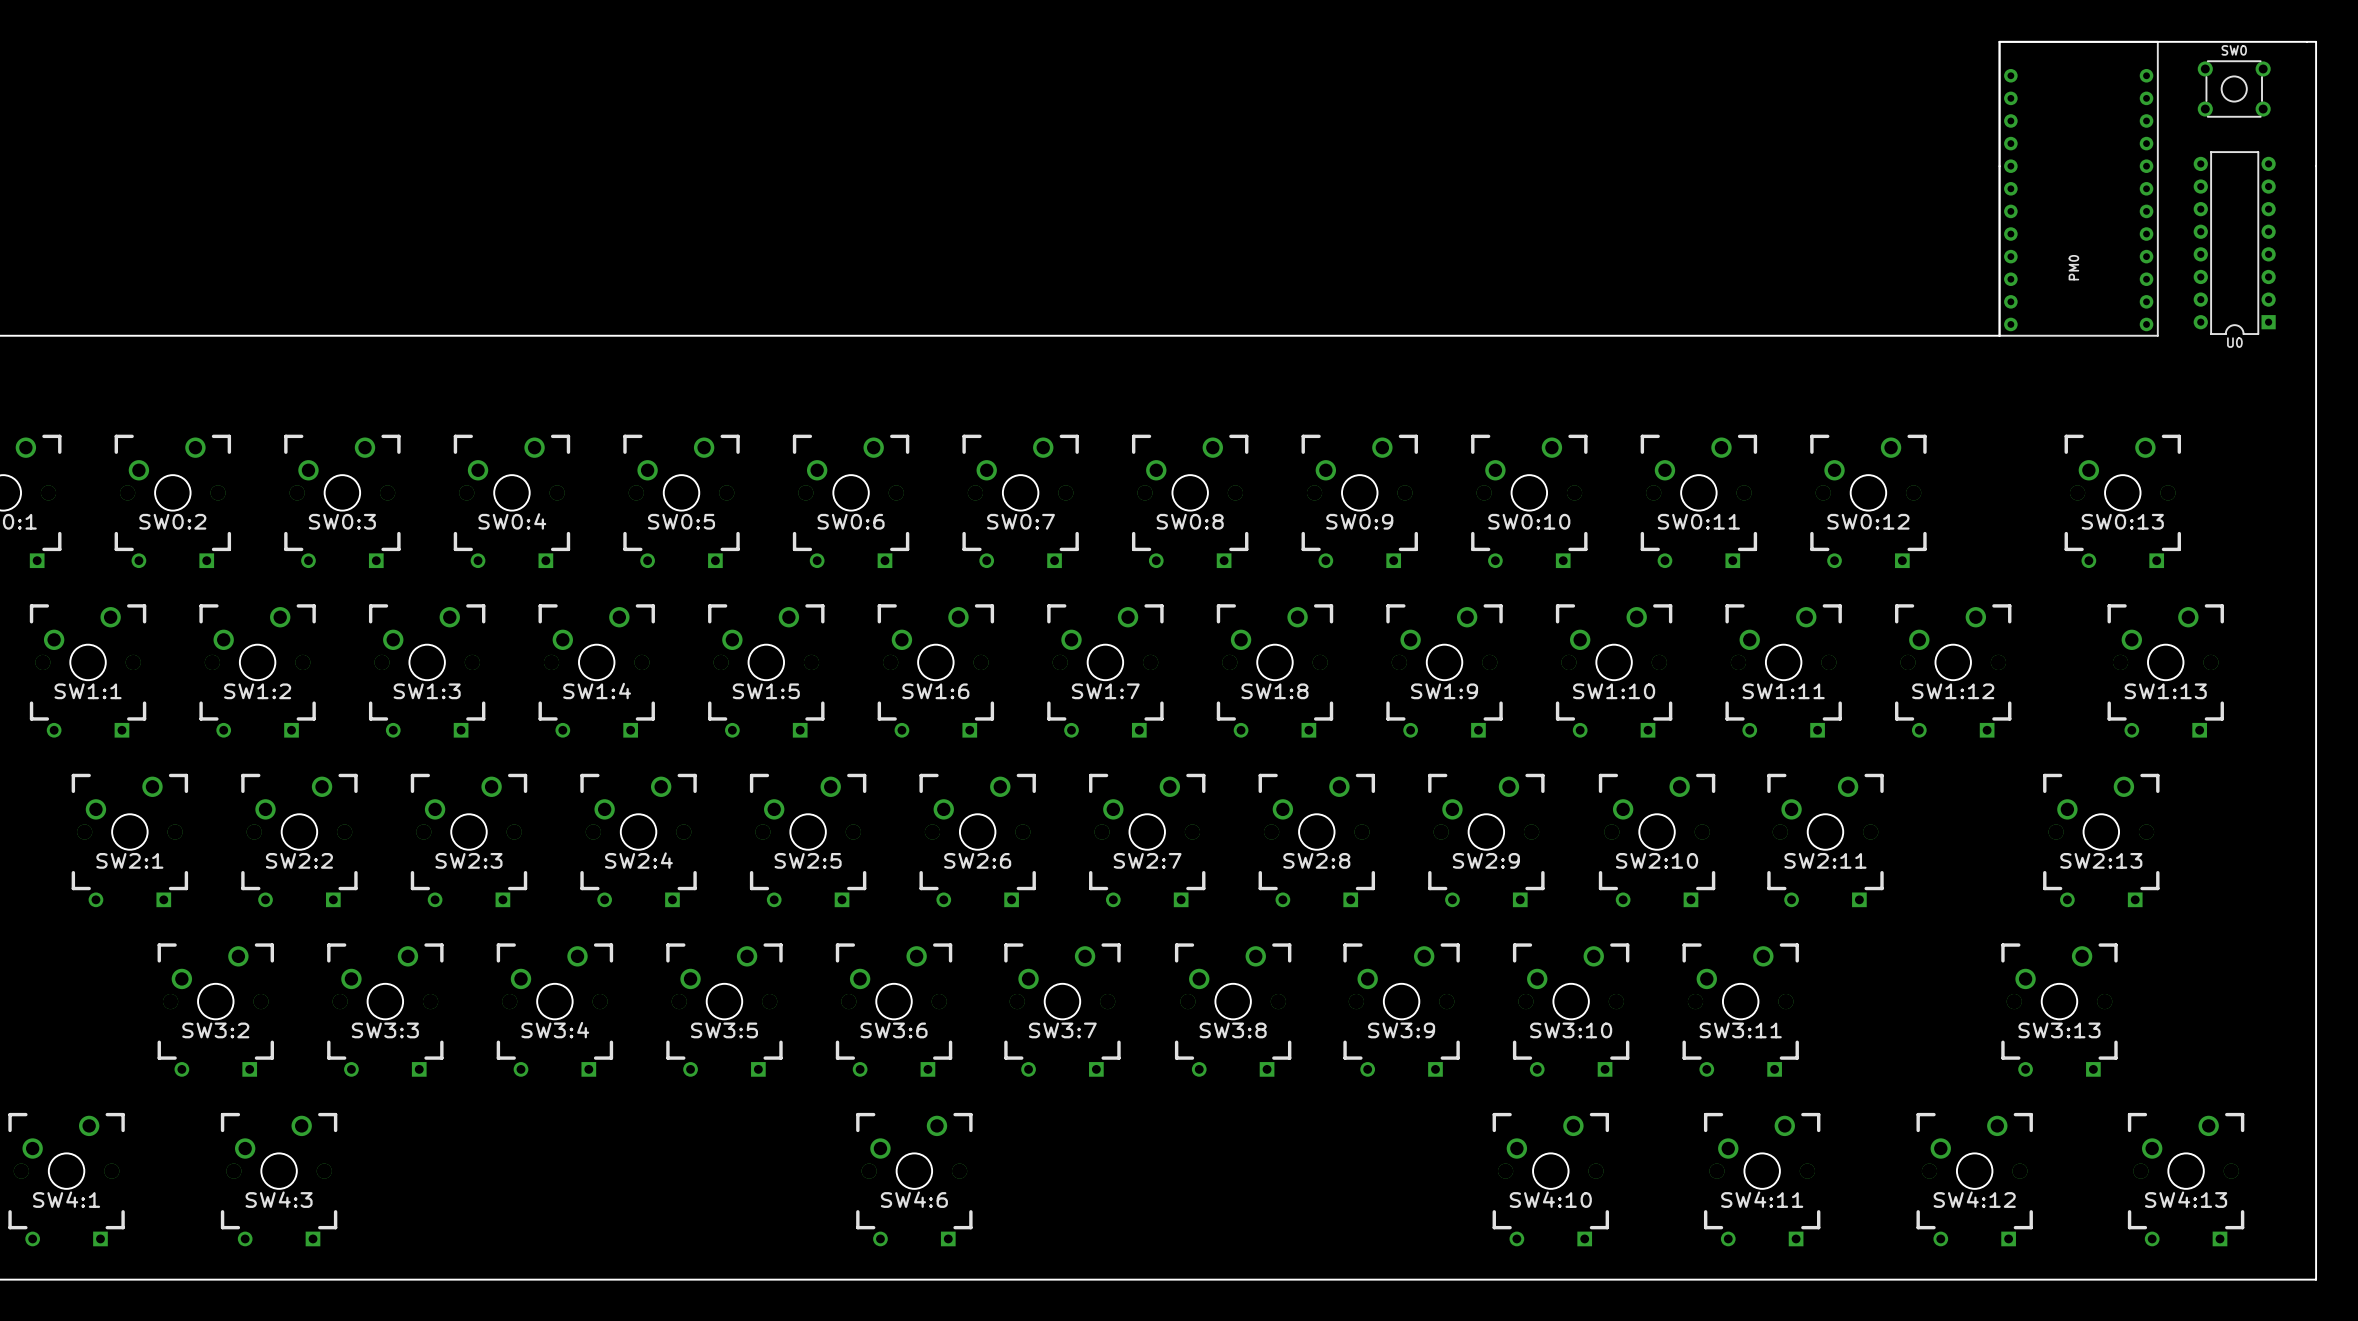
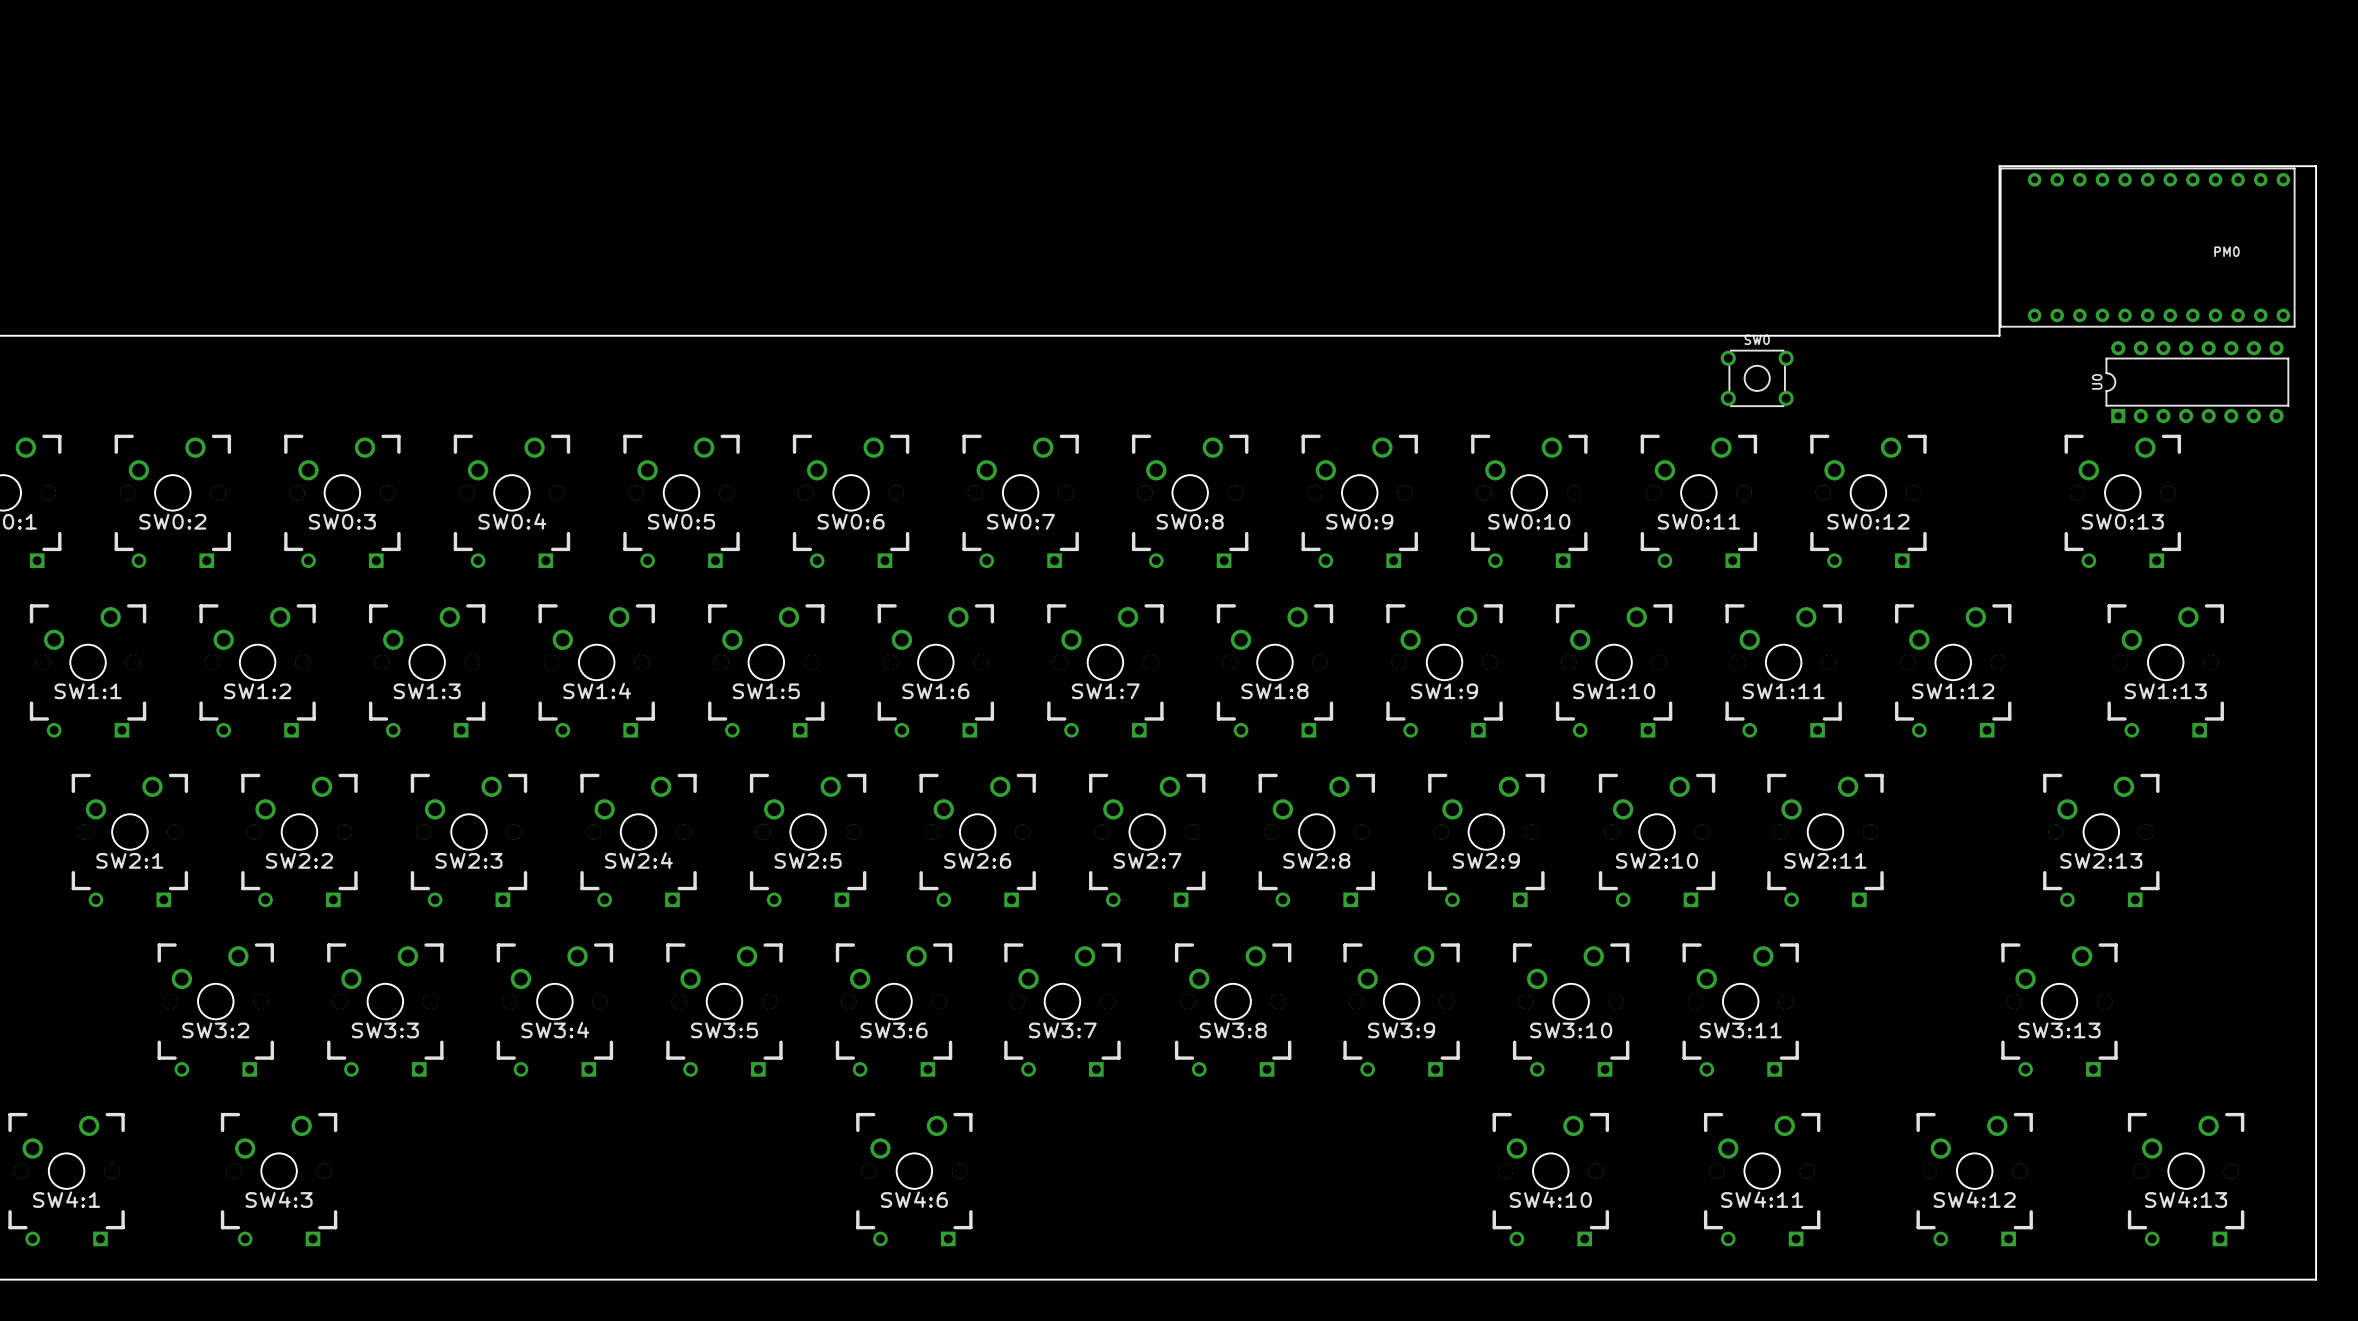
SW0 position: (2234, 89) -> (1757, 378)
board edge: (1999, 166) (1999, 41) (2316, 41) (2316, 166) -> (1999, 166) (2316, 166)
PM0 rotation: 0° (2078, 188) -> 90° counterclockwise (2147, 247)
U0 rotation: 0° (2234, 243) -> 90° clockwise (2197, 382)
U0 position: (2234, 243) -> (2197, 382)

